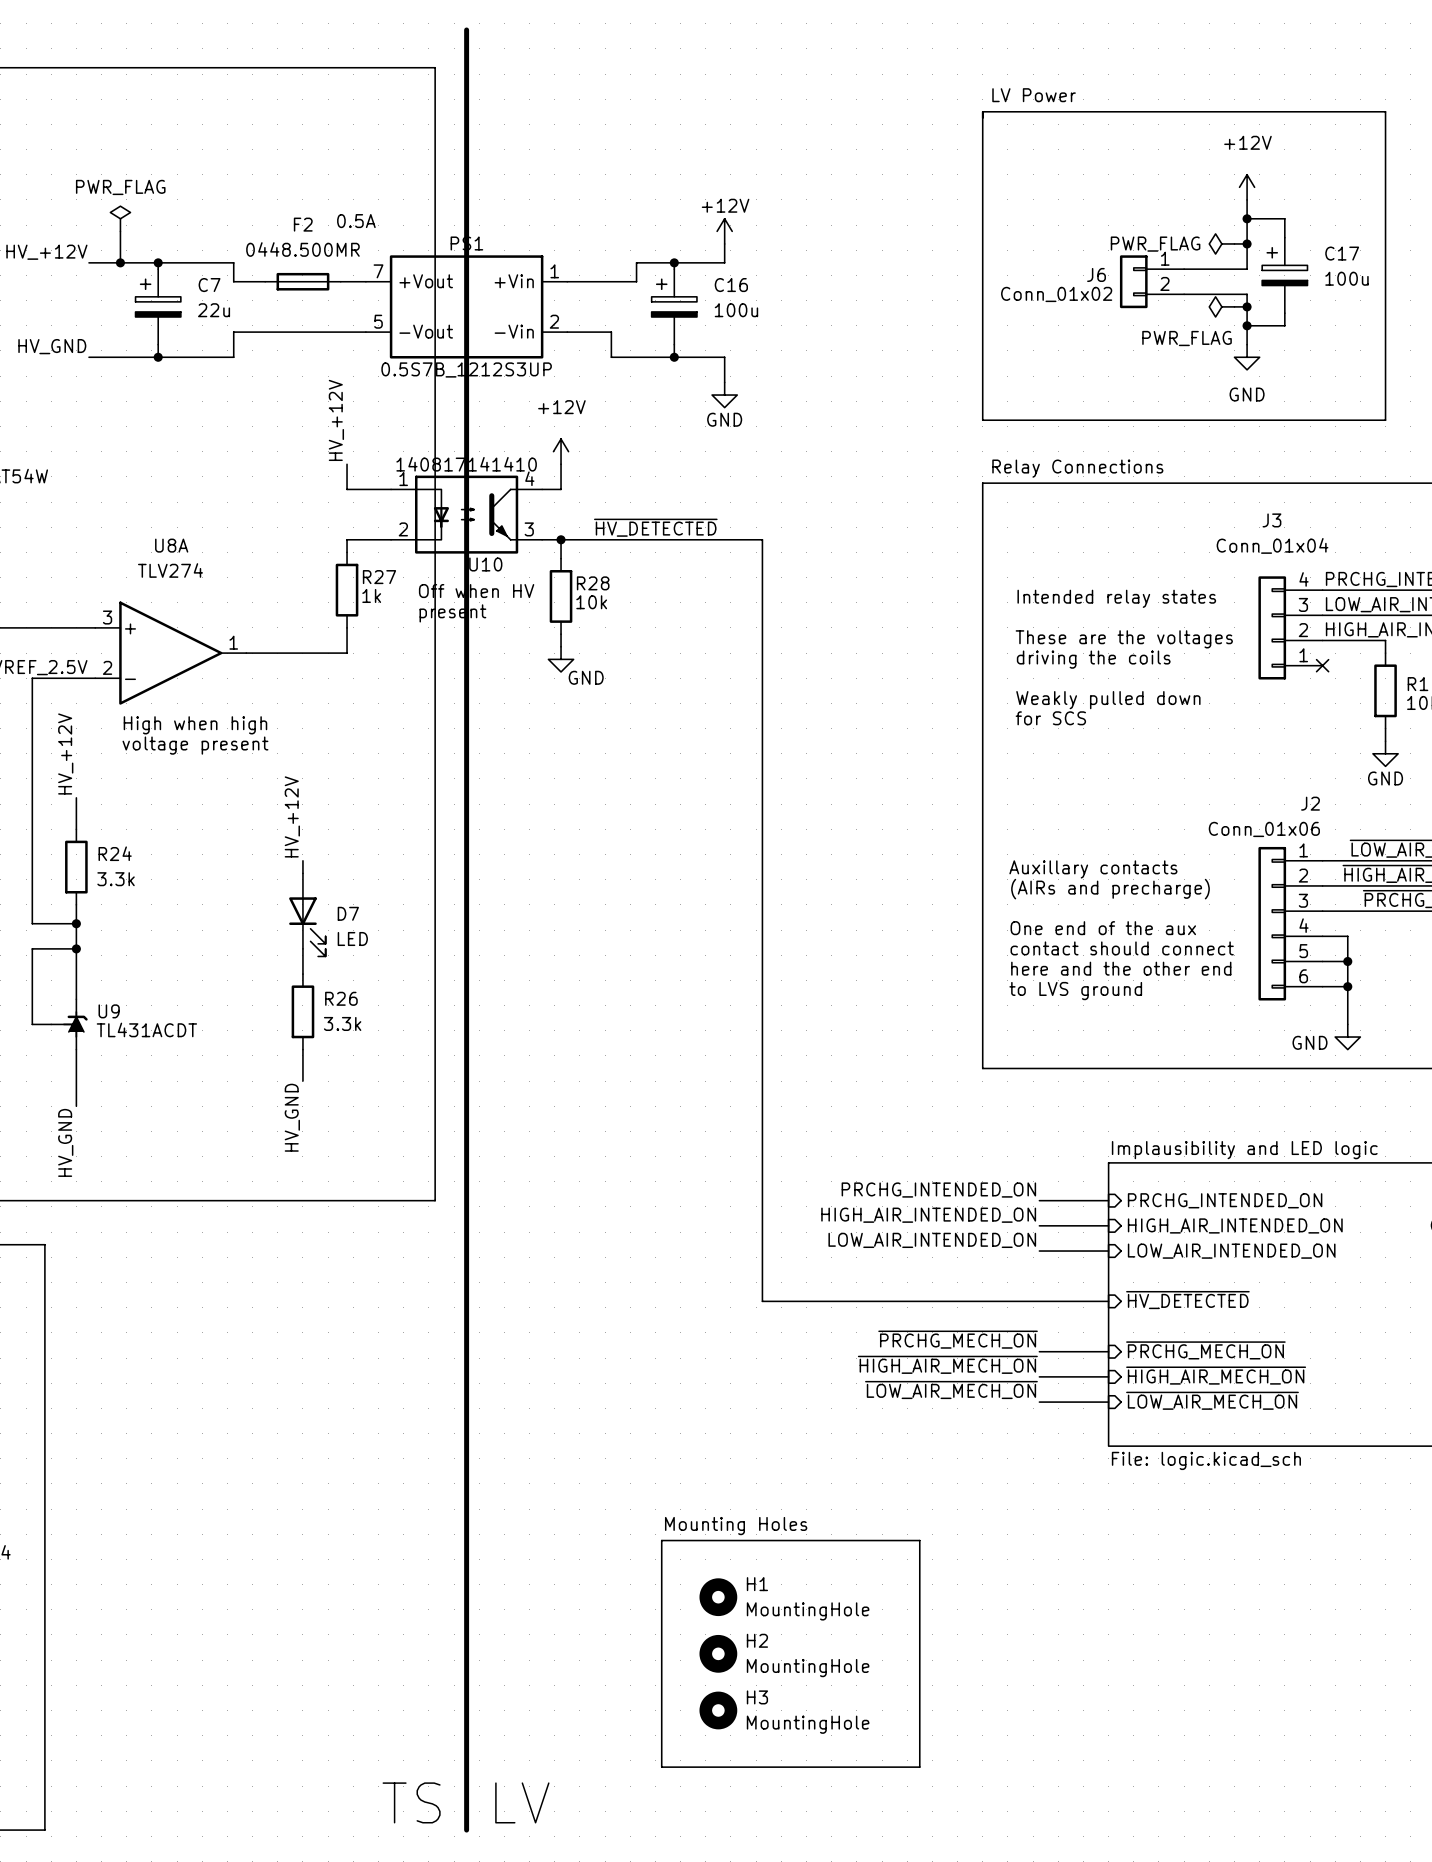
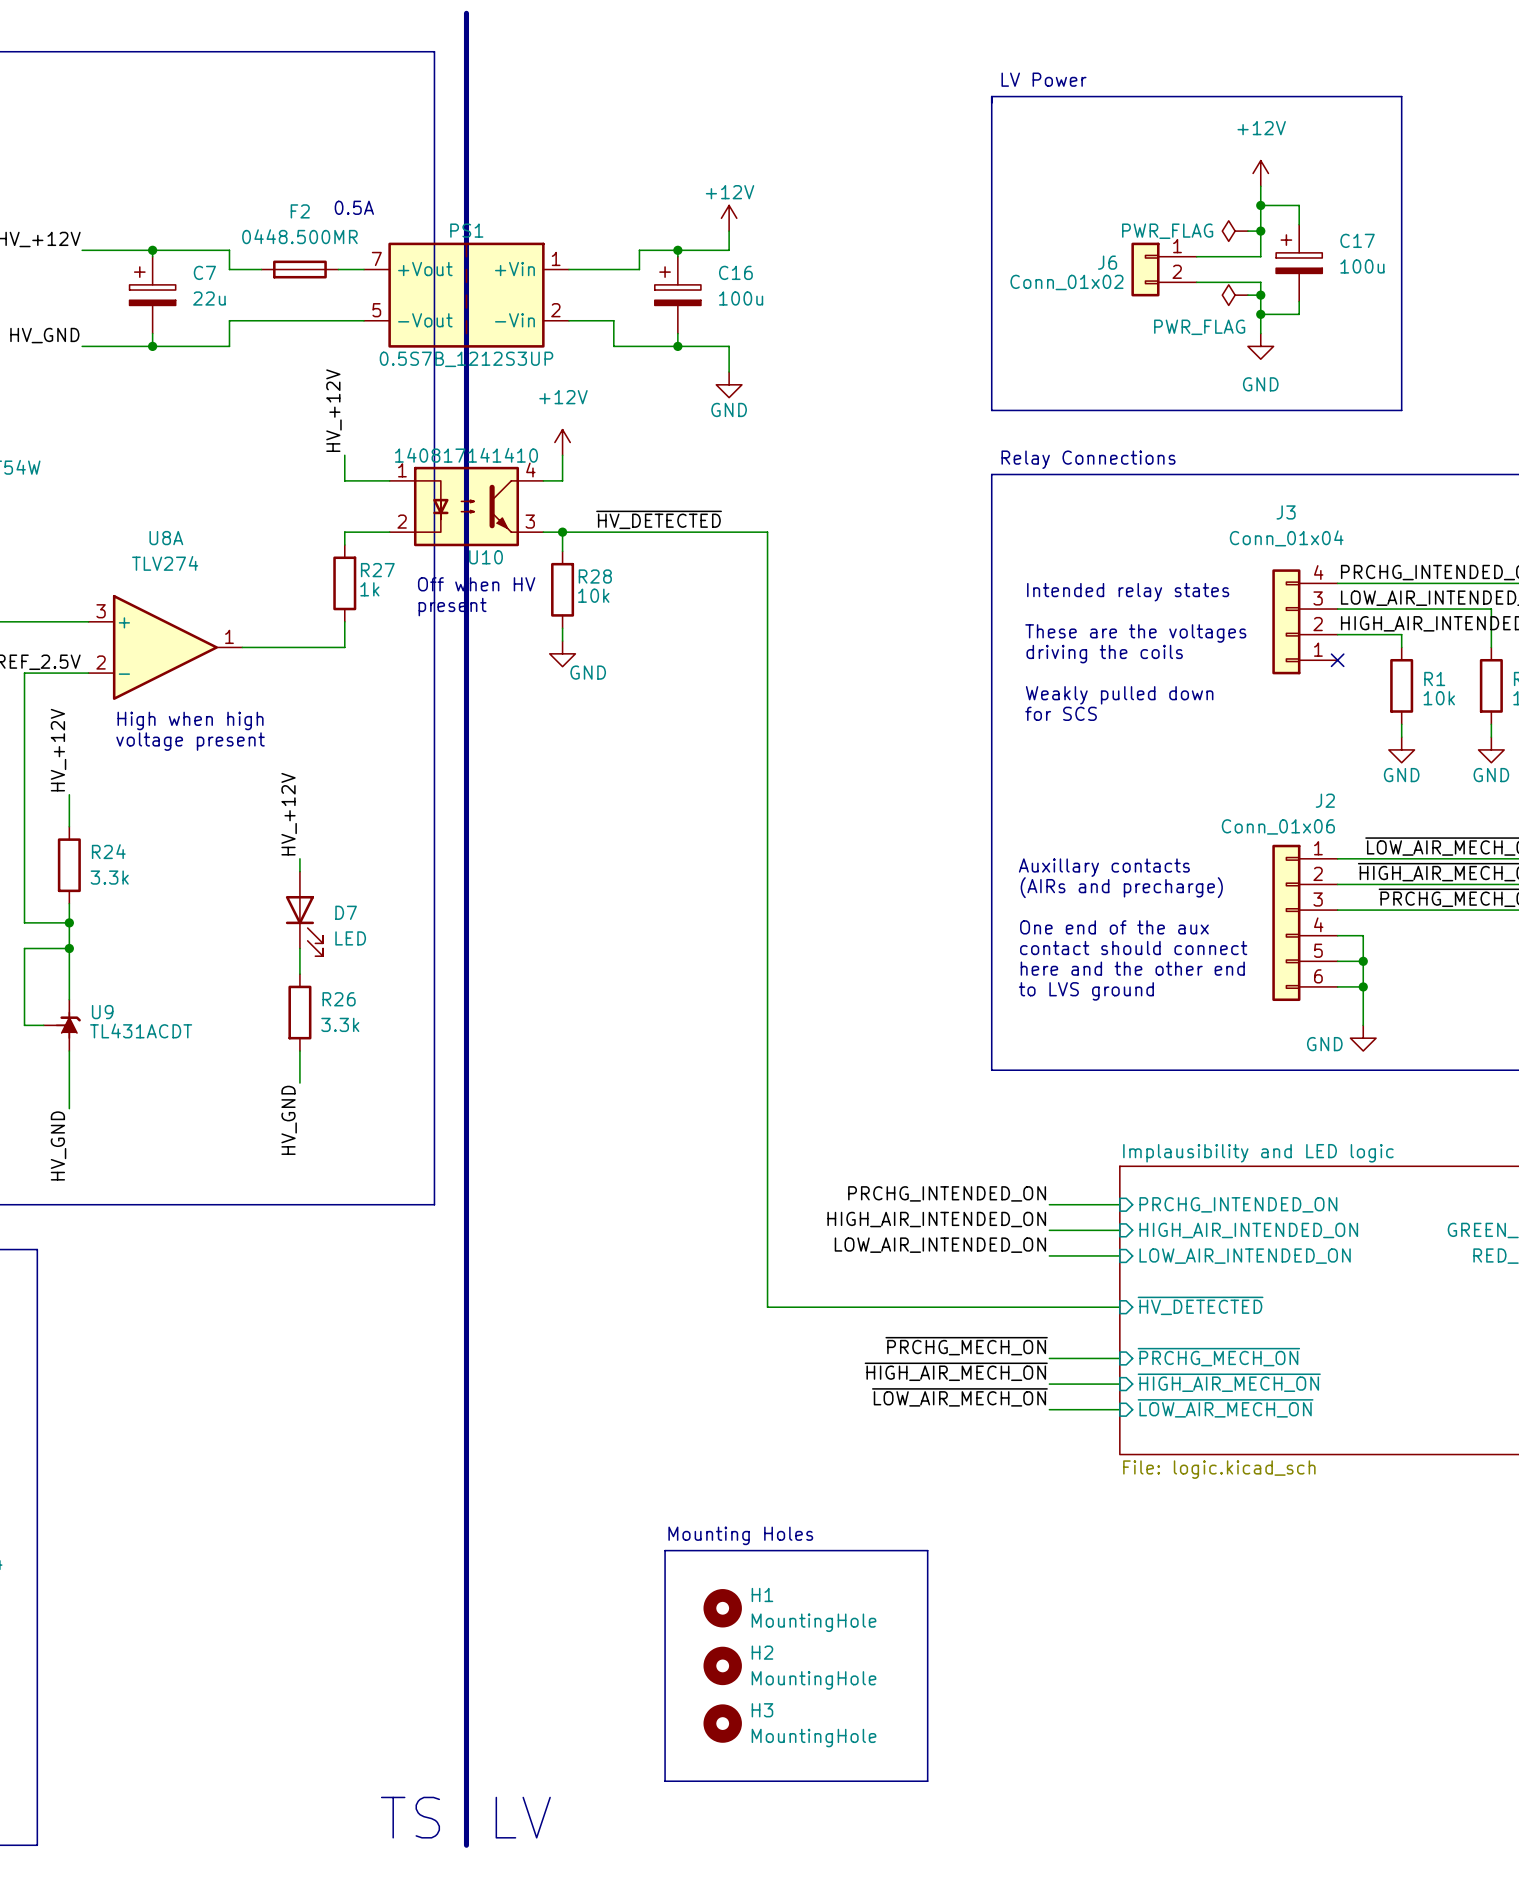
power symbol: PWR_FLAG (120, 218) -> none
wire: (120, 231) (120, 262) -> none
junction: (120, 262) -> none

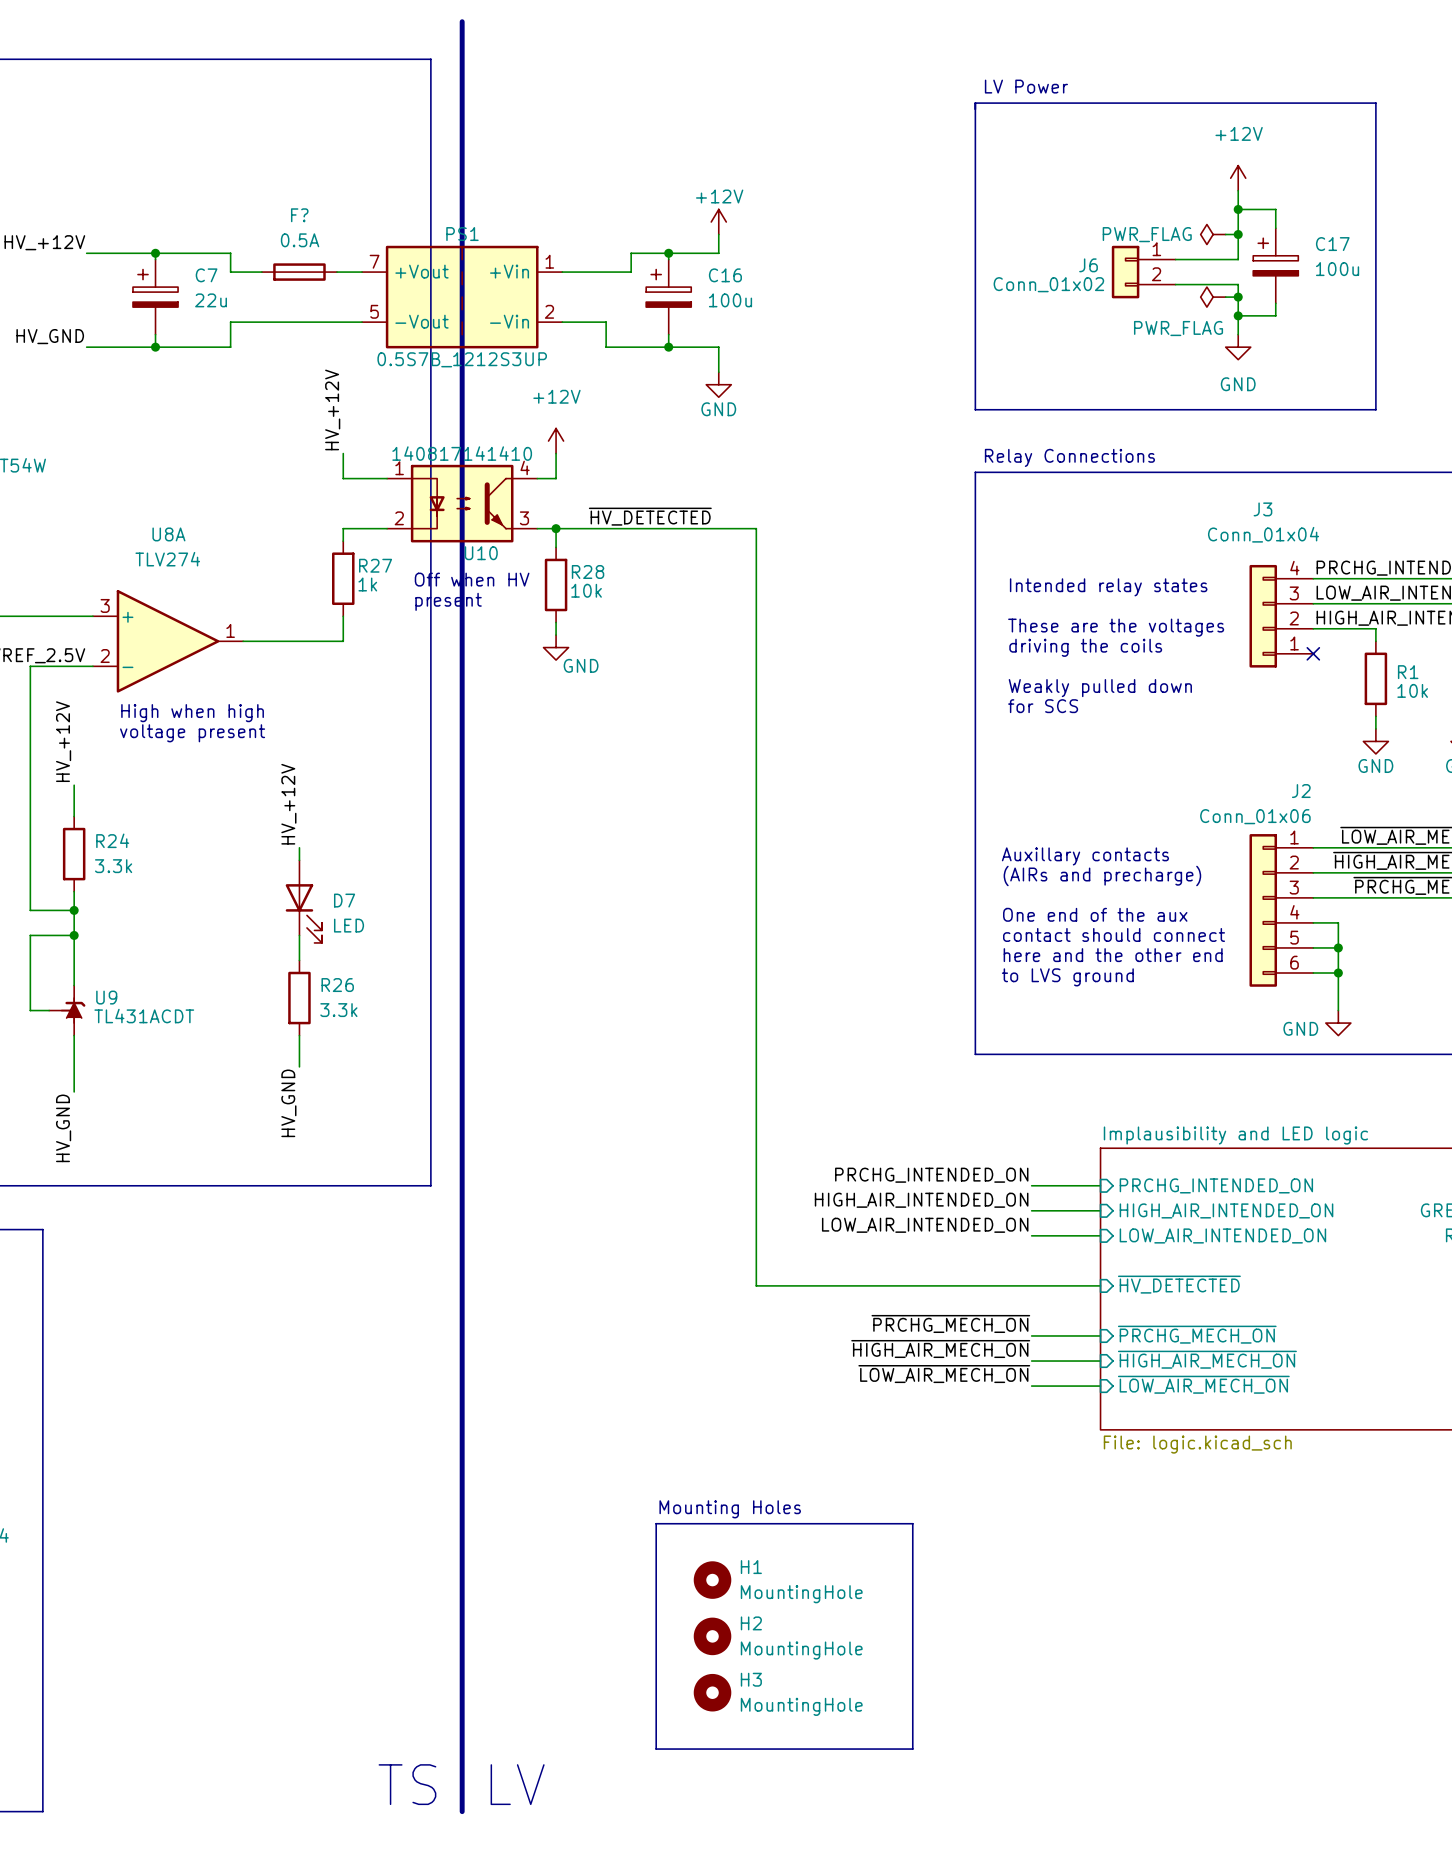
text: 0.5A (354, 207) -> none
F2 name: F2 (300, 211) -> F? (299, 215)
F2 value: 0448.500MR (299, 236) -> 0.5A (300, 240)

